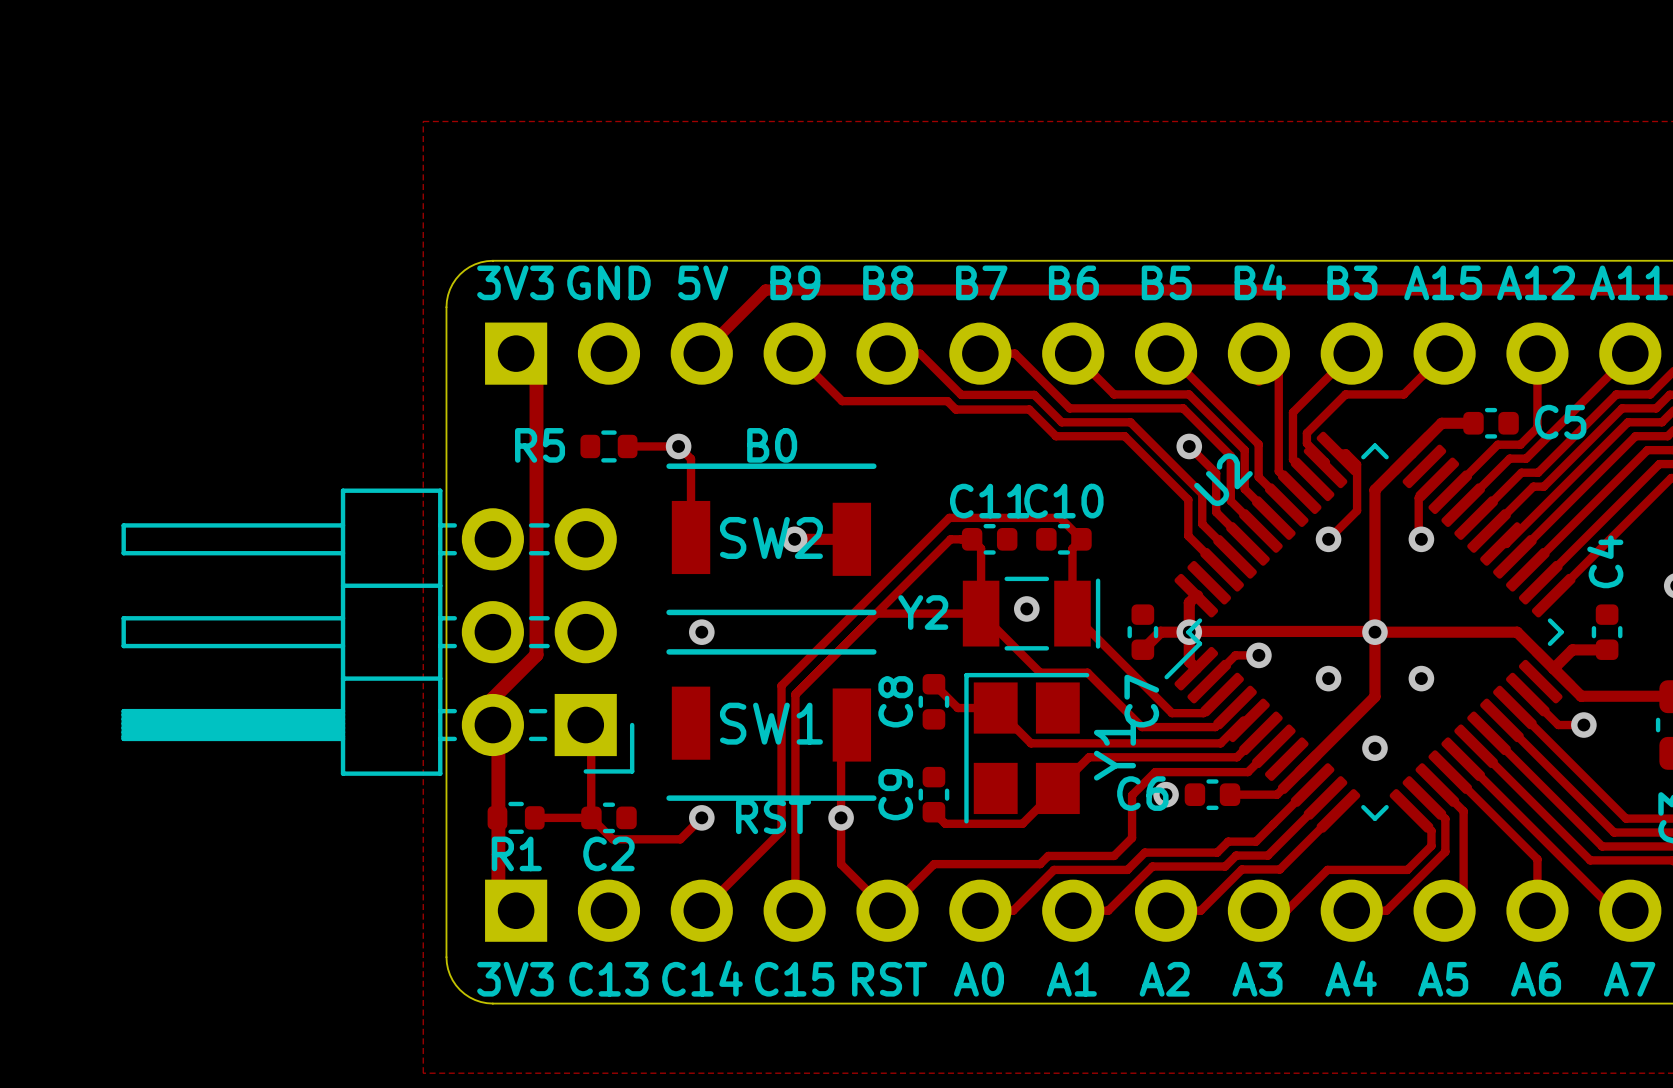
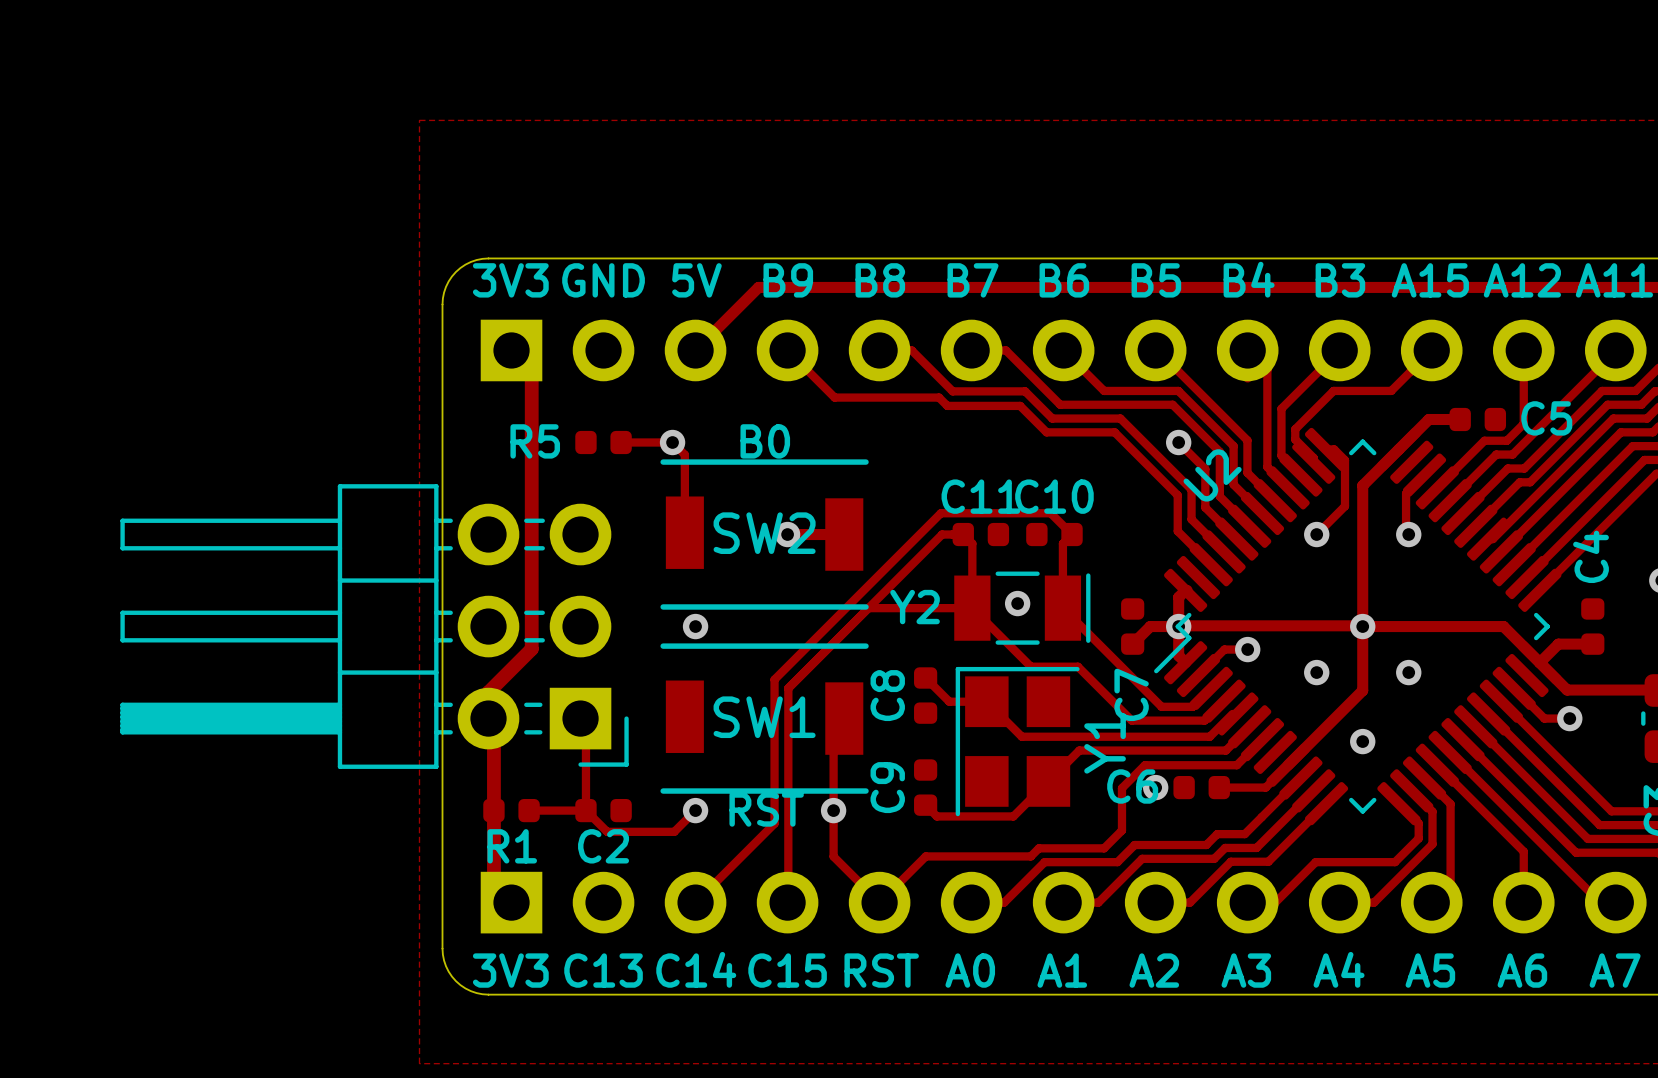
C5 footprint: [1463, 407, 1519, 439] -> [1449, 407, 1507, 432]
R5 footprint: [580, 430, 638, 463] -> [575, 430, 632, 455]
C11 footprint: [961, 523, 1018, 555] -> [952, 522, 1010, 547]
C10 footprint: [1036, 523, 1092, 555] -> [1026, 522, 1083, 547]
C7 footprint: [1127, 604, 1159, 660] -> [1121, 598, 1145, 655]
C4 footprint: [1591, 604, 1623, 660] -> [1581, 598, 1605, 655]
C8 footprint: [918, 674, 950, 730] -> [914, 667, 938, 724]
C9 footprint: [918, 766, 950, 823] -> [914, 759, 938, 816]
C6 footprint: [1184, 779, 1241, 811] -> [1173, 775, 1230, 800]
R1 footprint: [487, 801, 545, 834] -> [483, 799, 540, 823]
C2 footprint: [581, 802, 637, 834] -> [575, 799, 632, 823]

